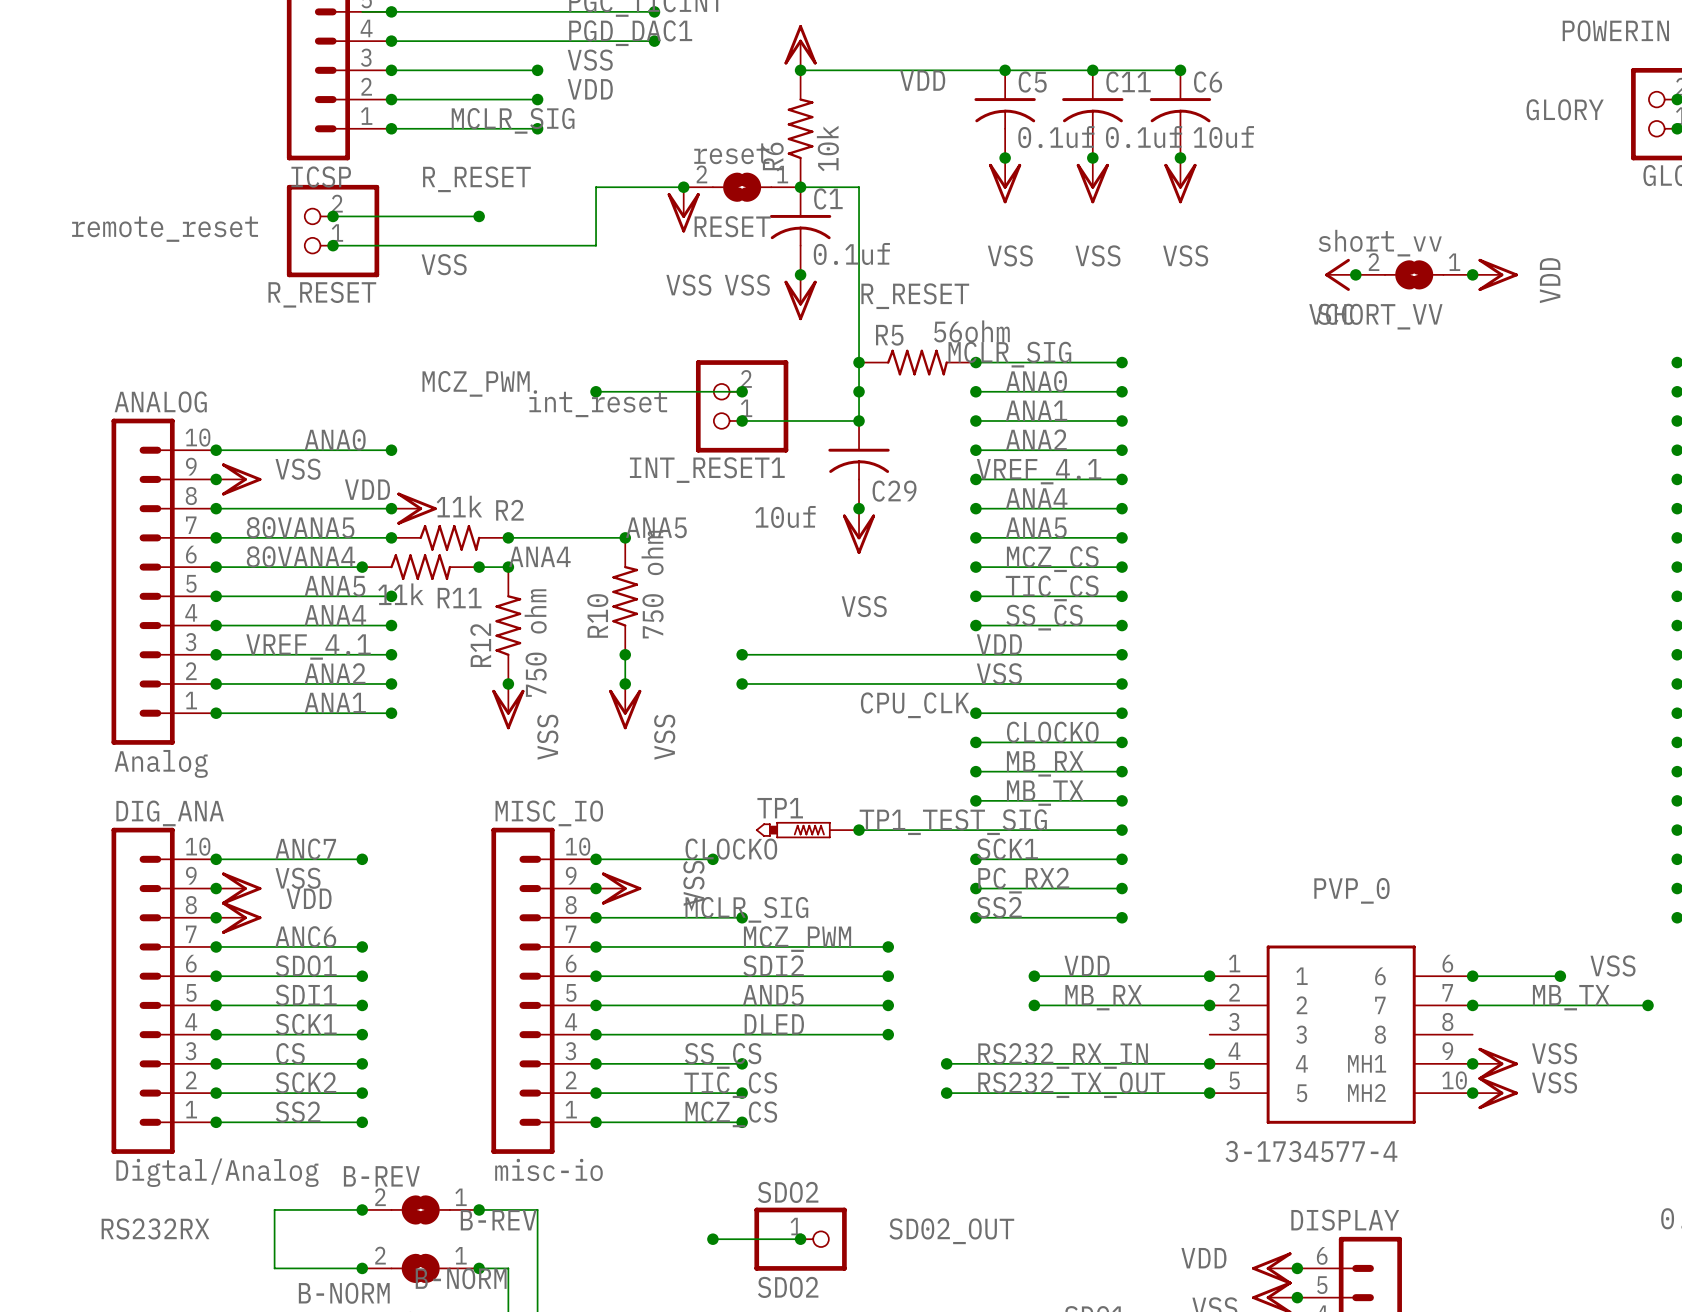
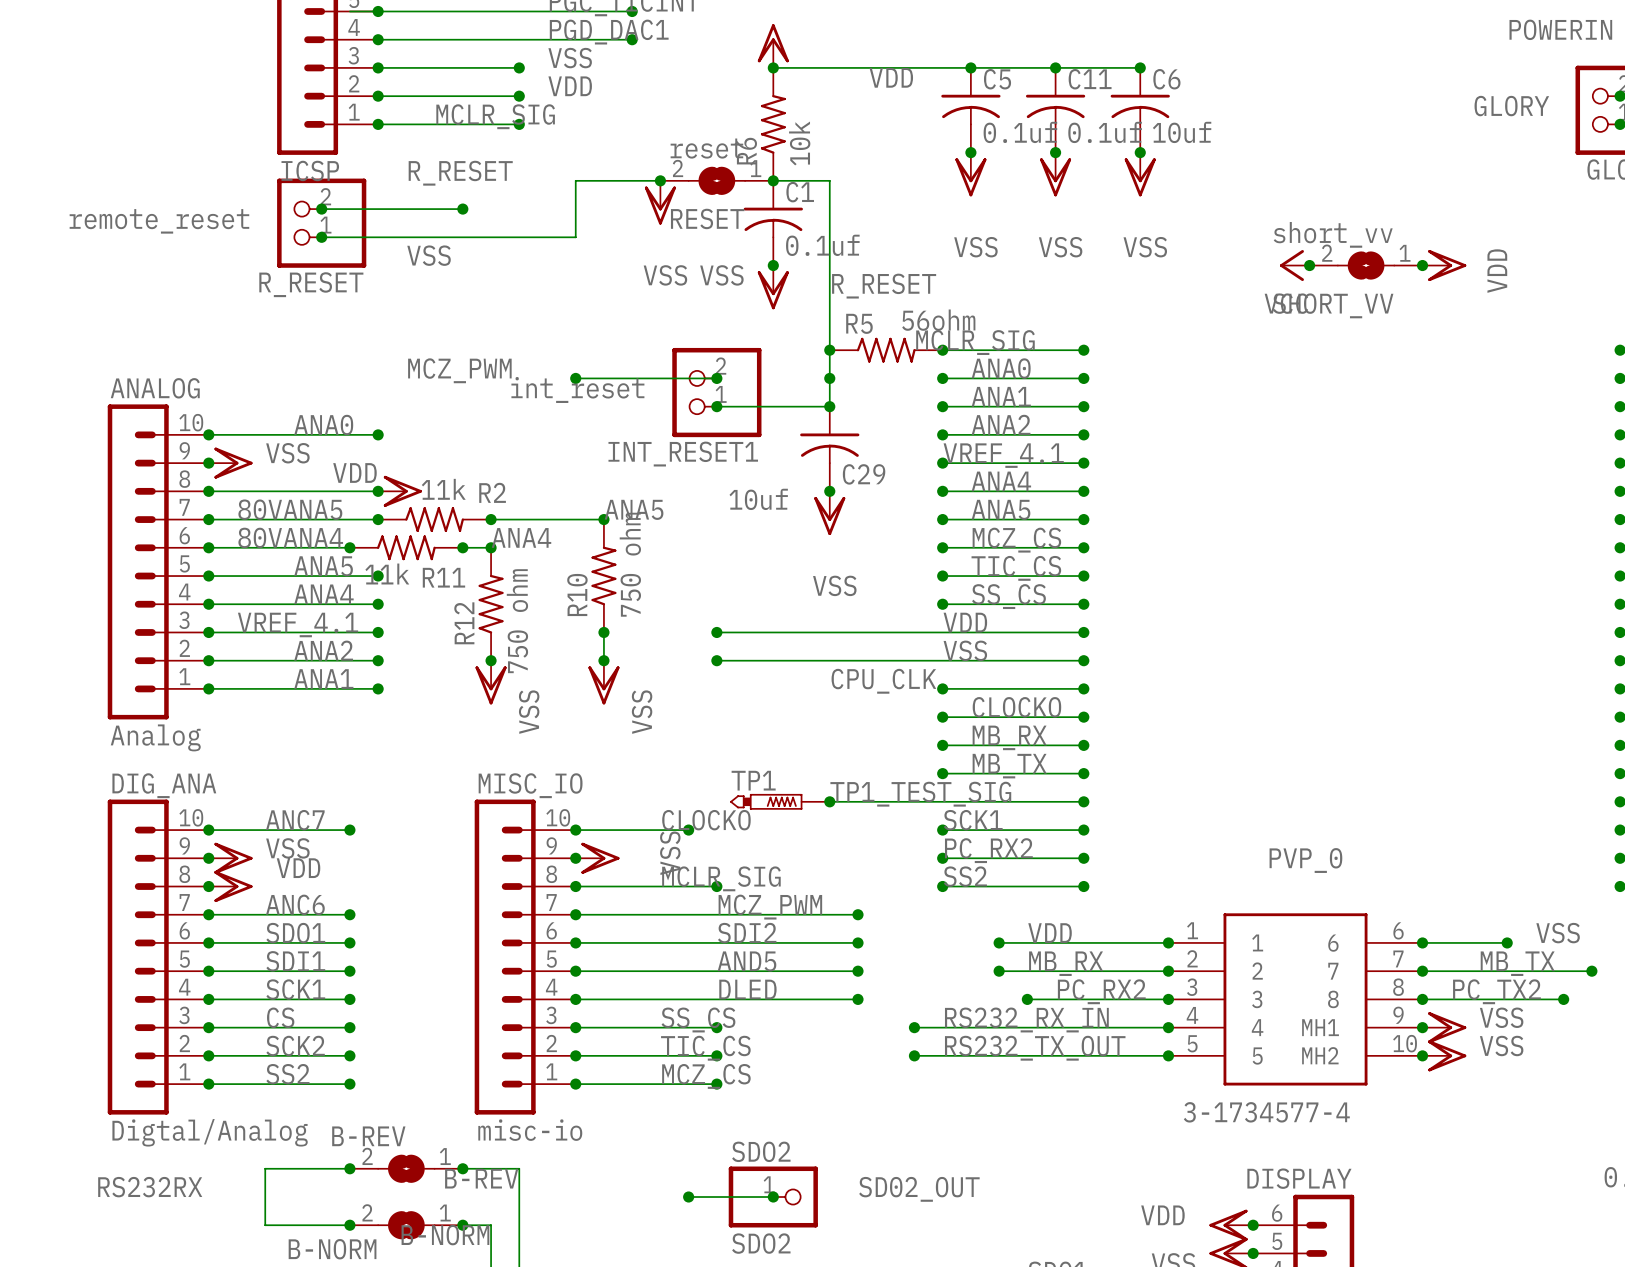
label: none -> PC_RX2 (1101, 991)
label: none -> PC_TX2 (1496, 991)
wire: none -> (1027, 999) (1168, 999)
junction: none -> (1027, 999)
junction: none -> (1168, 999)
wire: none -> (1422, 999) (1563, 999)
junction: none -> (1422, 999)
junction: none -> (1563, 999)

